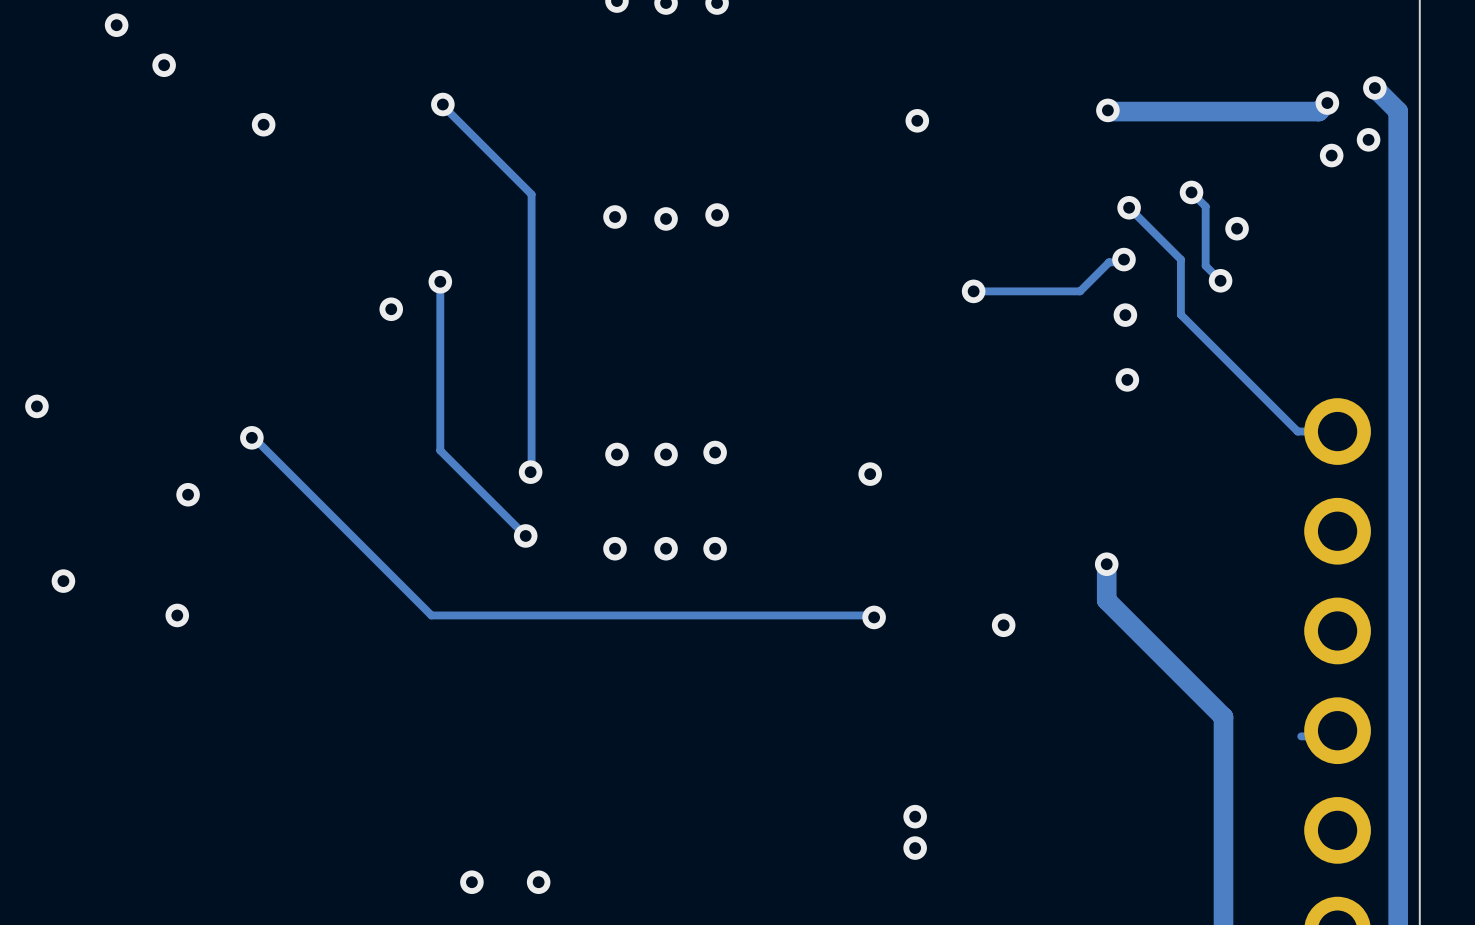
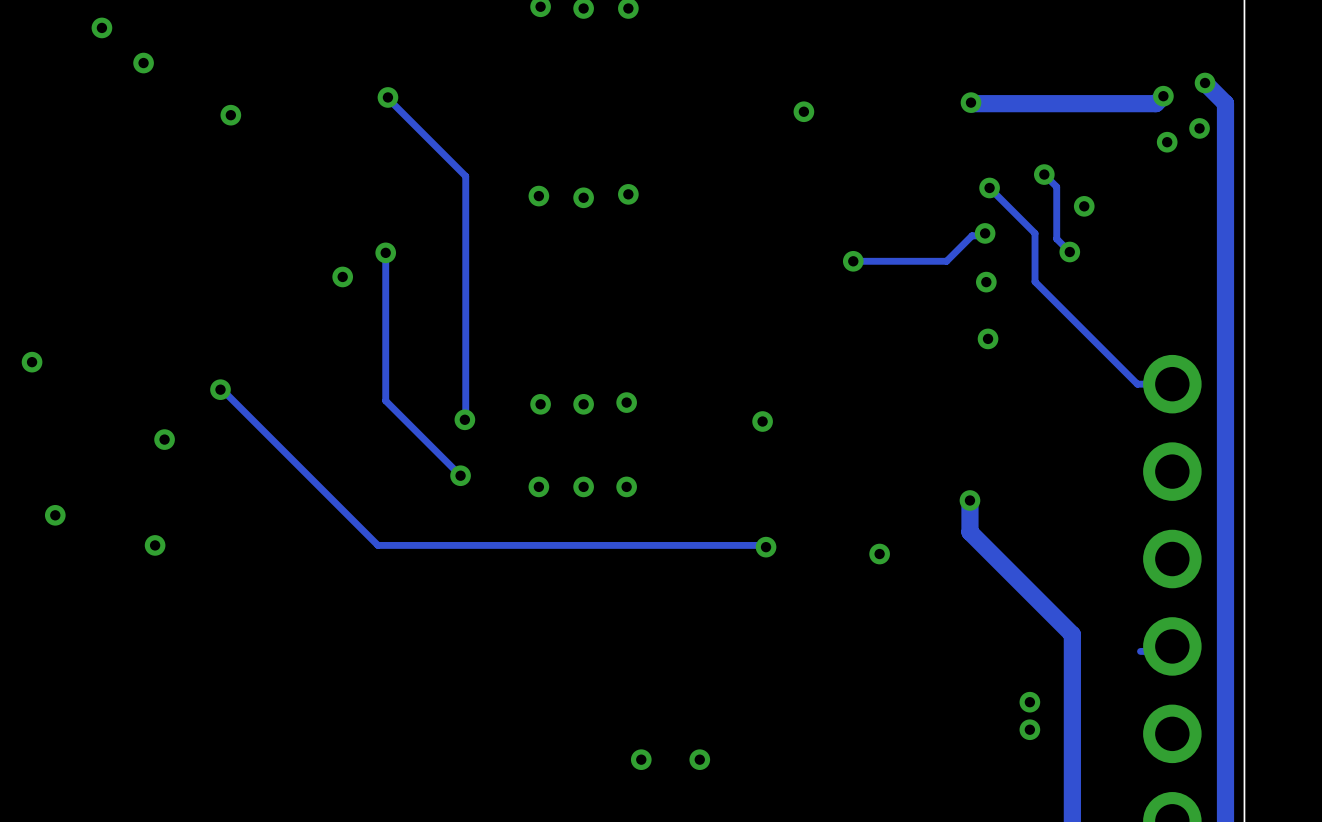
via: none -> (1029, 702)
via: (915, 816) -> none
via: none -> (1029, 729)
via: (915, 848) -> none
via: none -> (641, 759)
via: none -> (699, 759)
via: (471, 882) -> none
via: (538, 882) -> none

